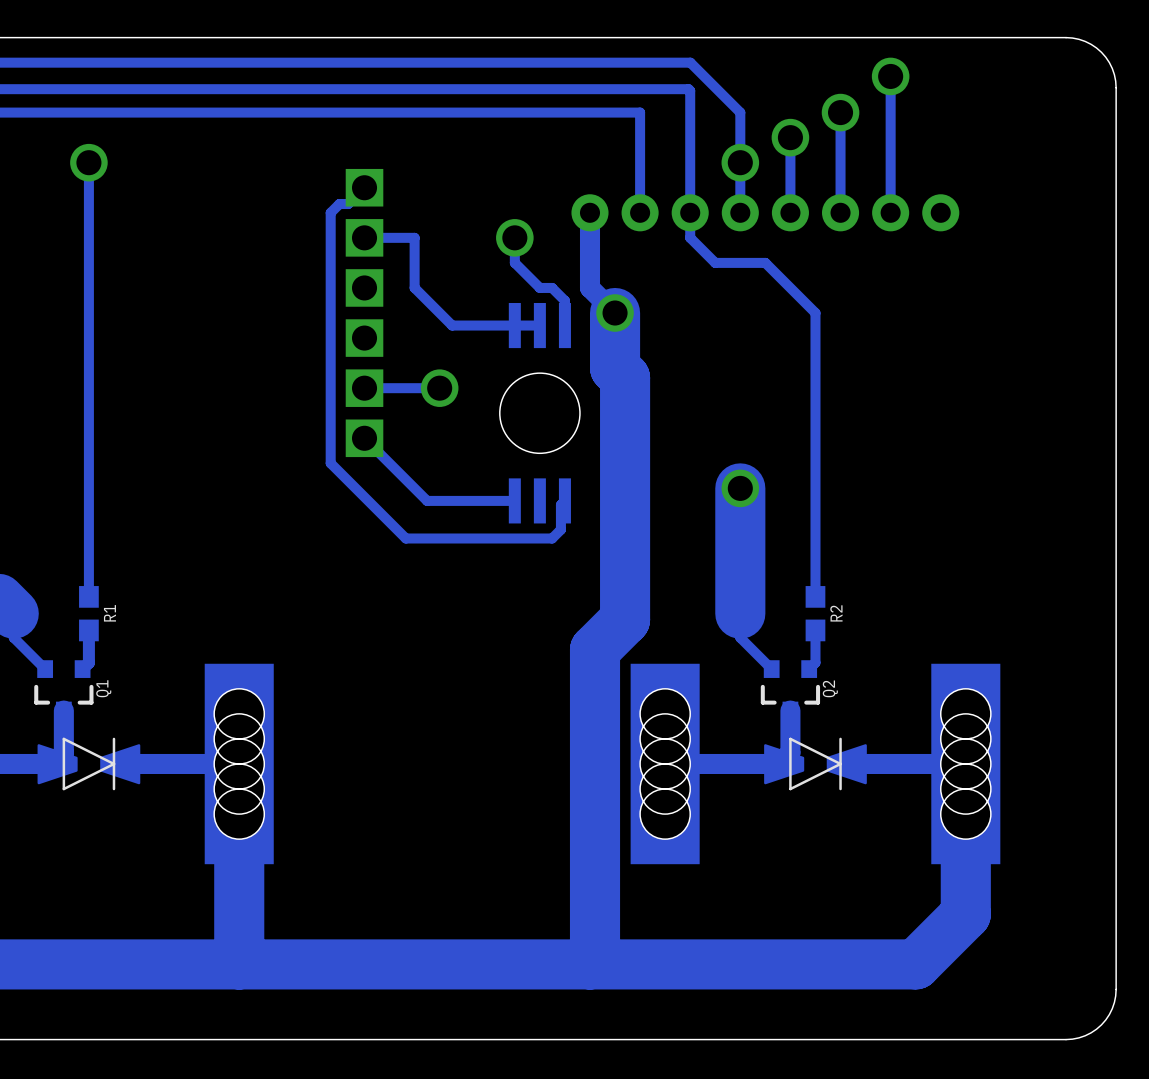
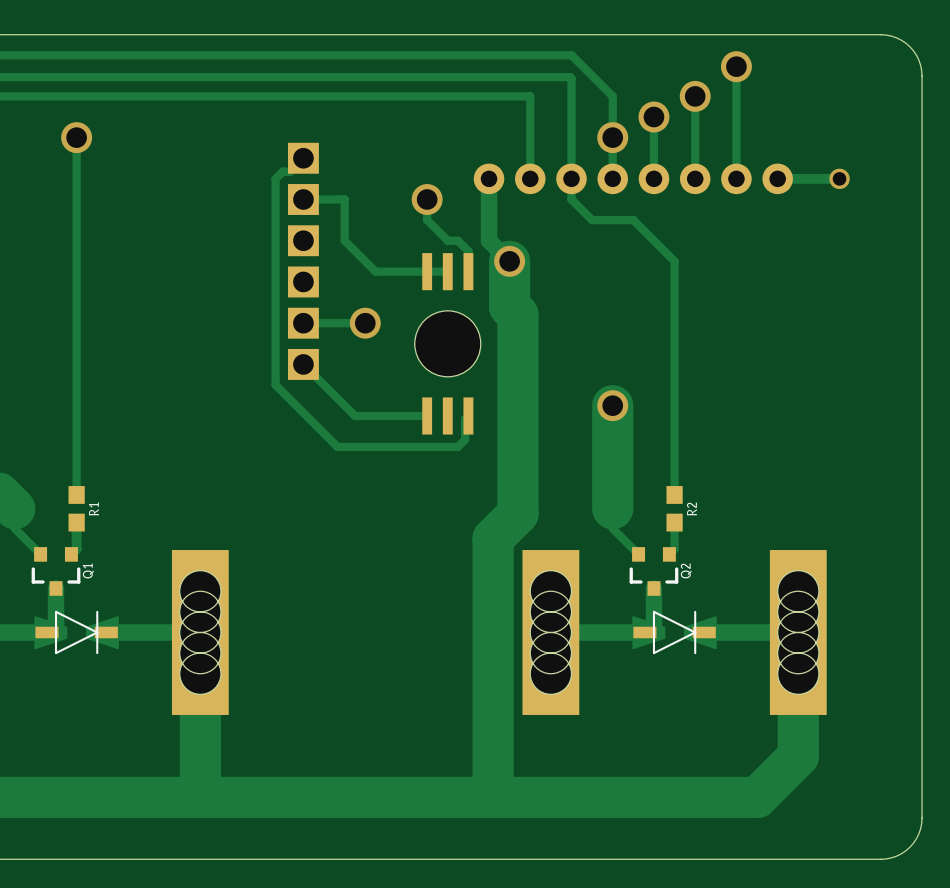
track: none -> (839, 178) (777, 178)
via: none -> (839, 178)

